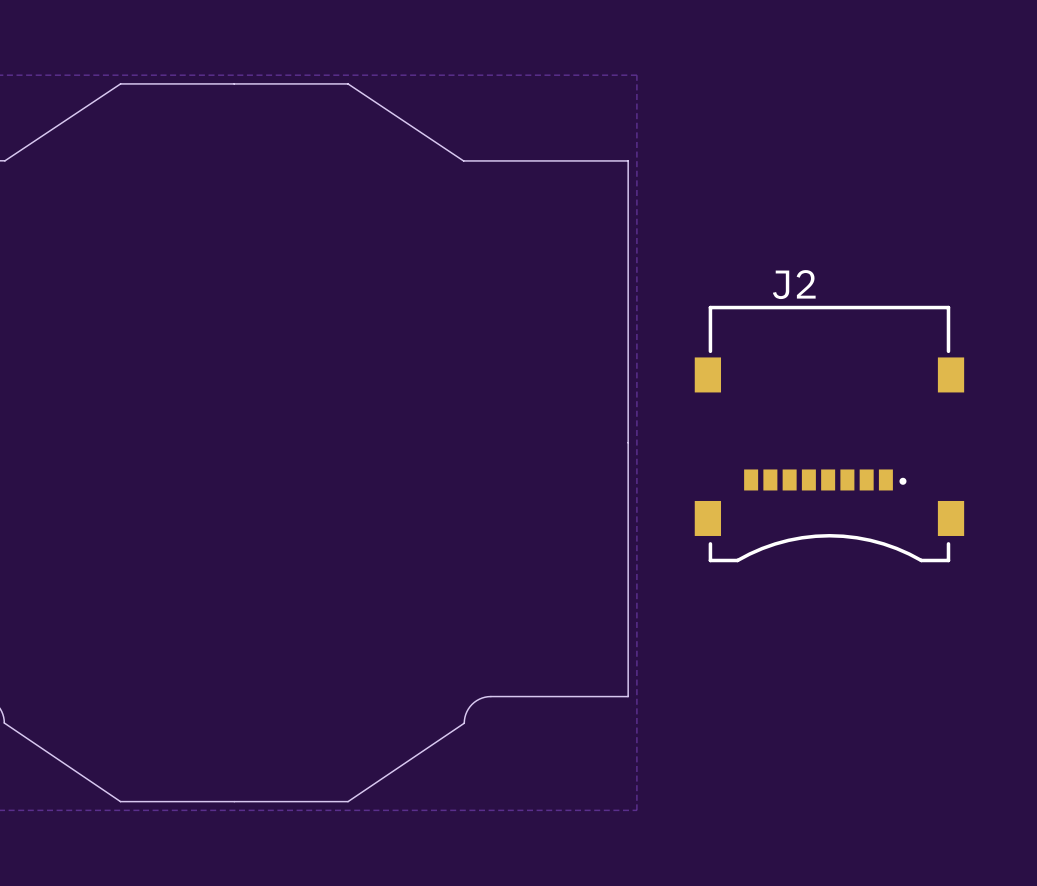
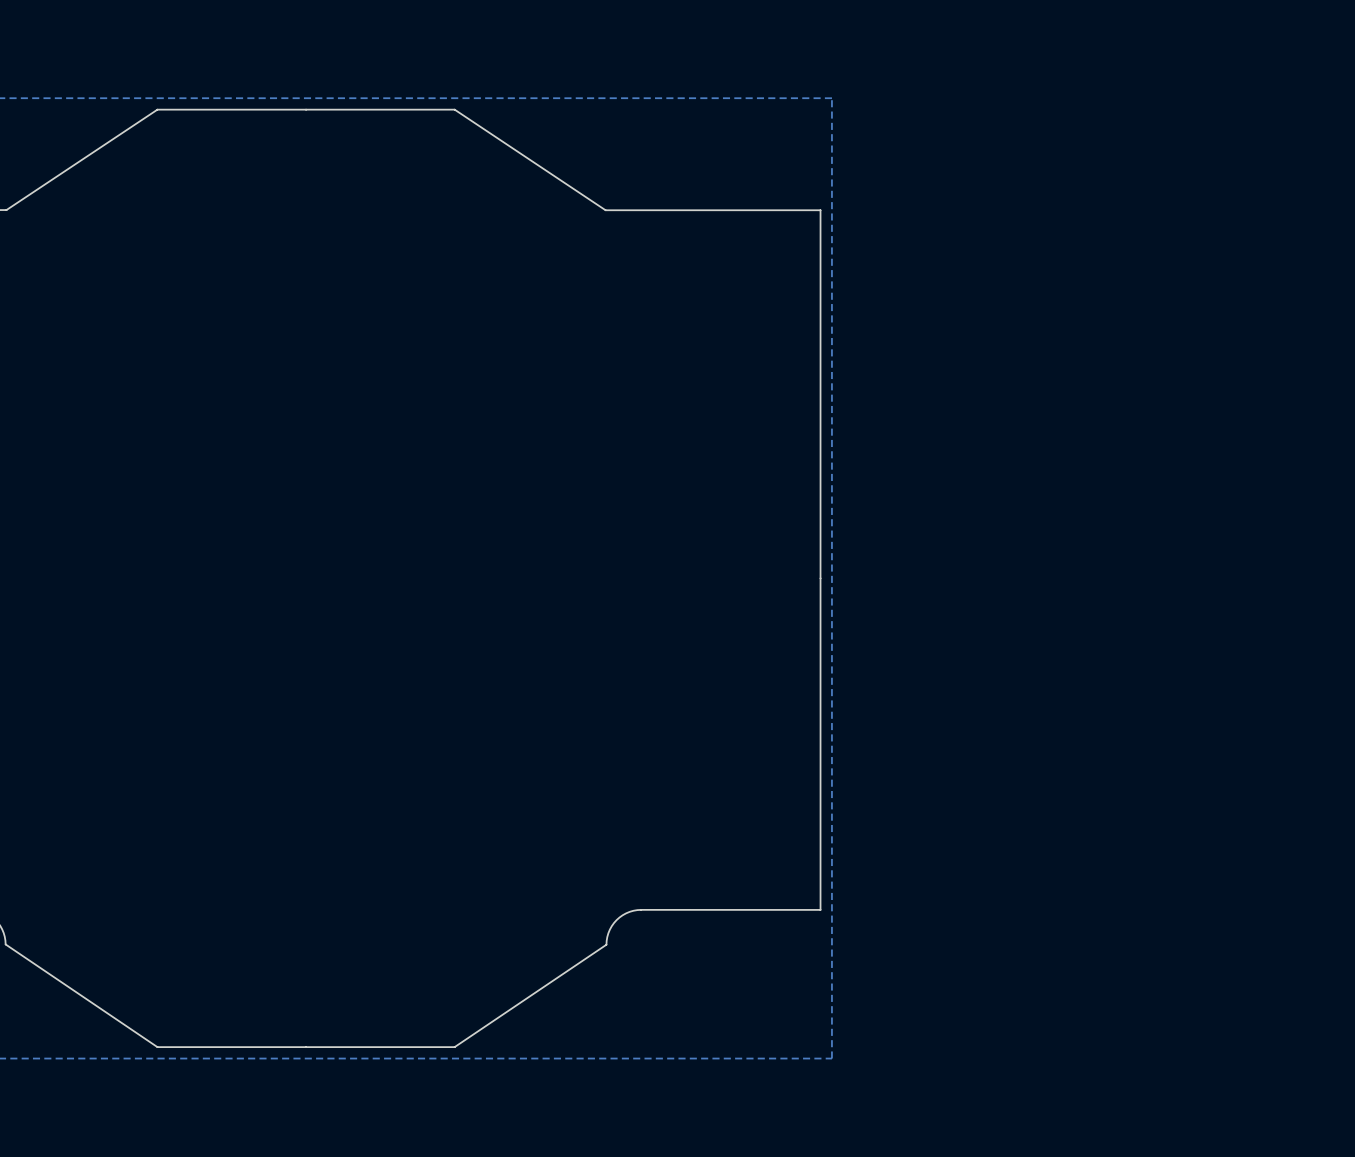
J2: (829, 434) -> none

